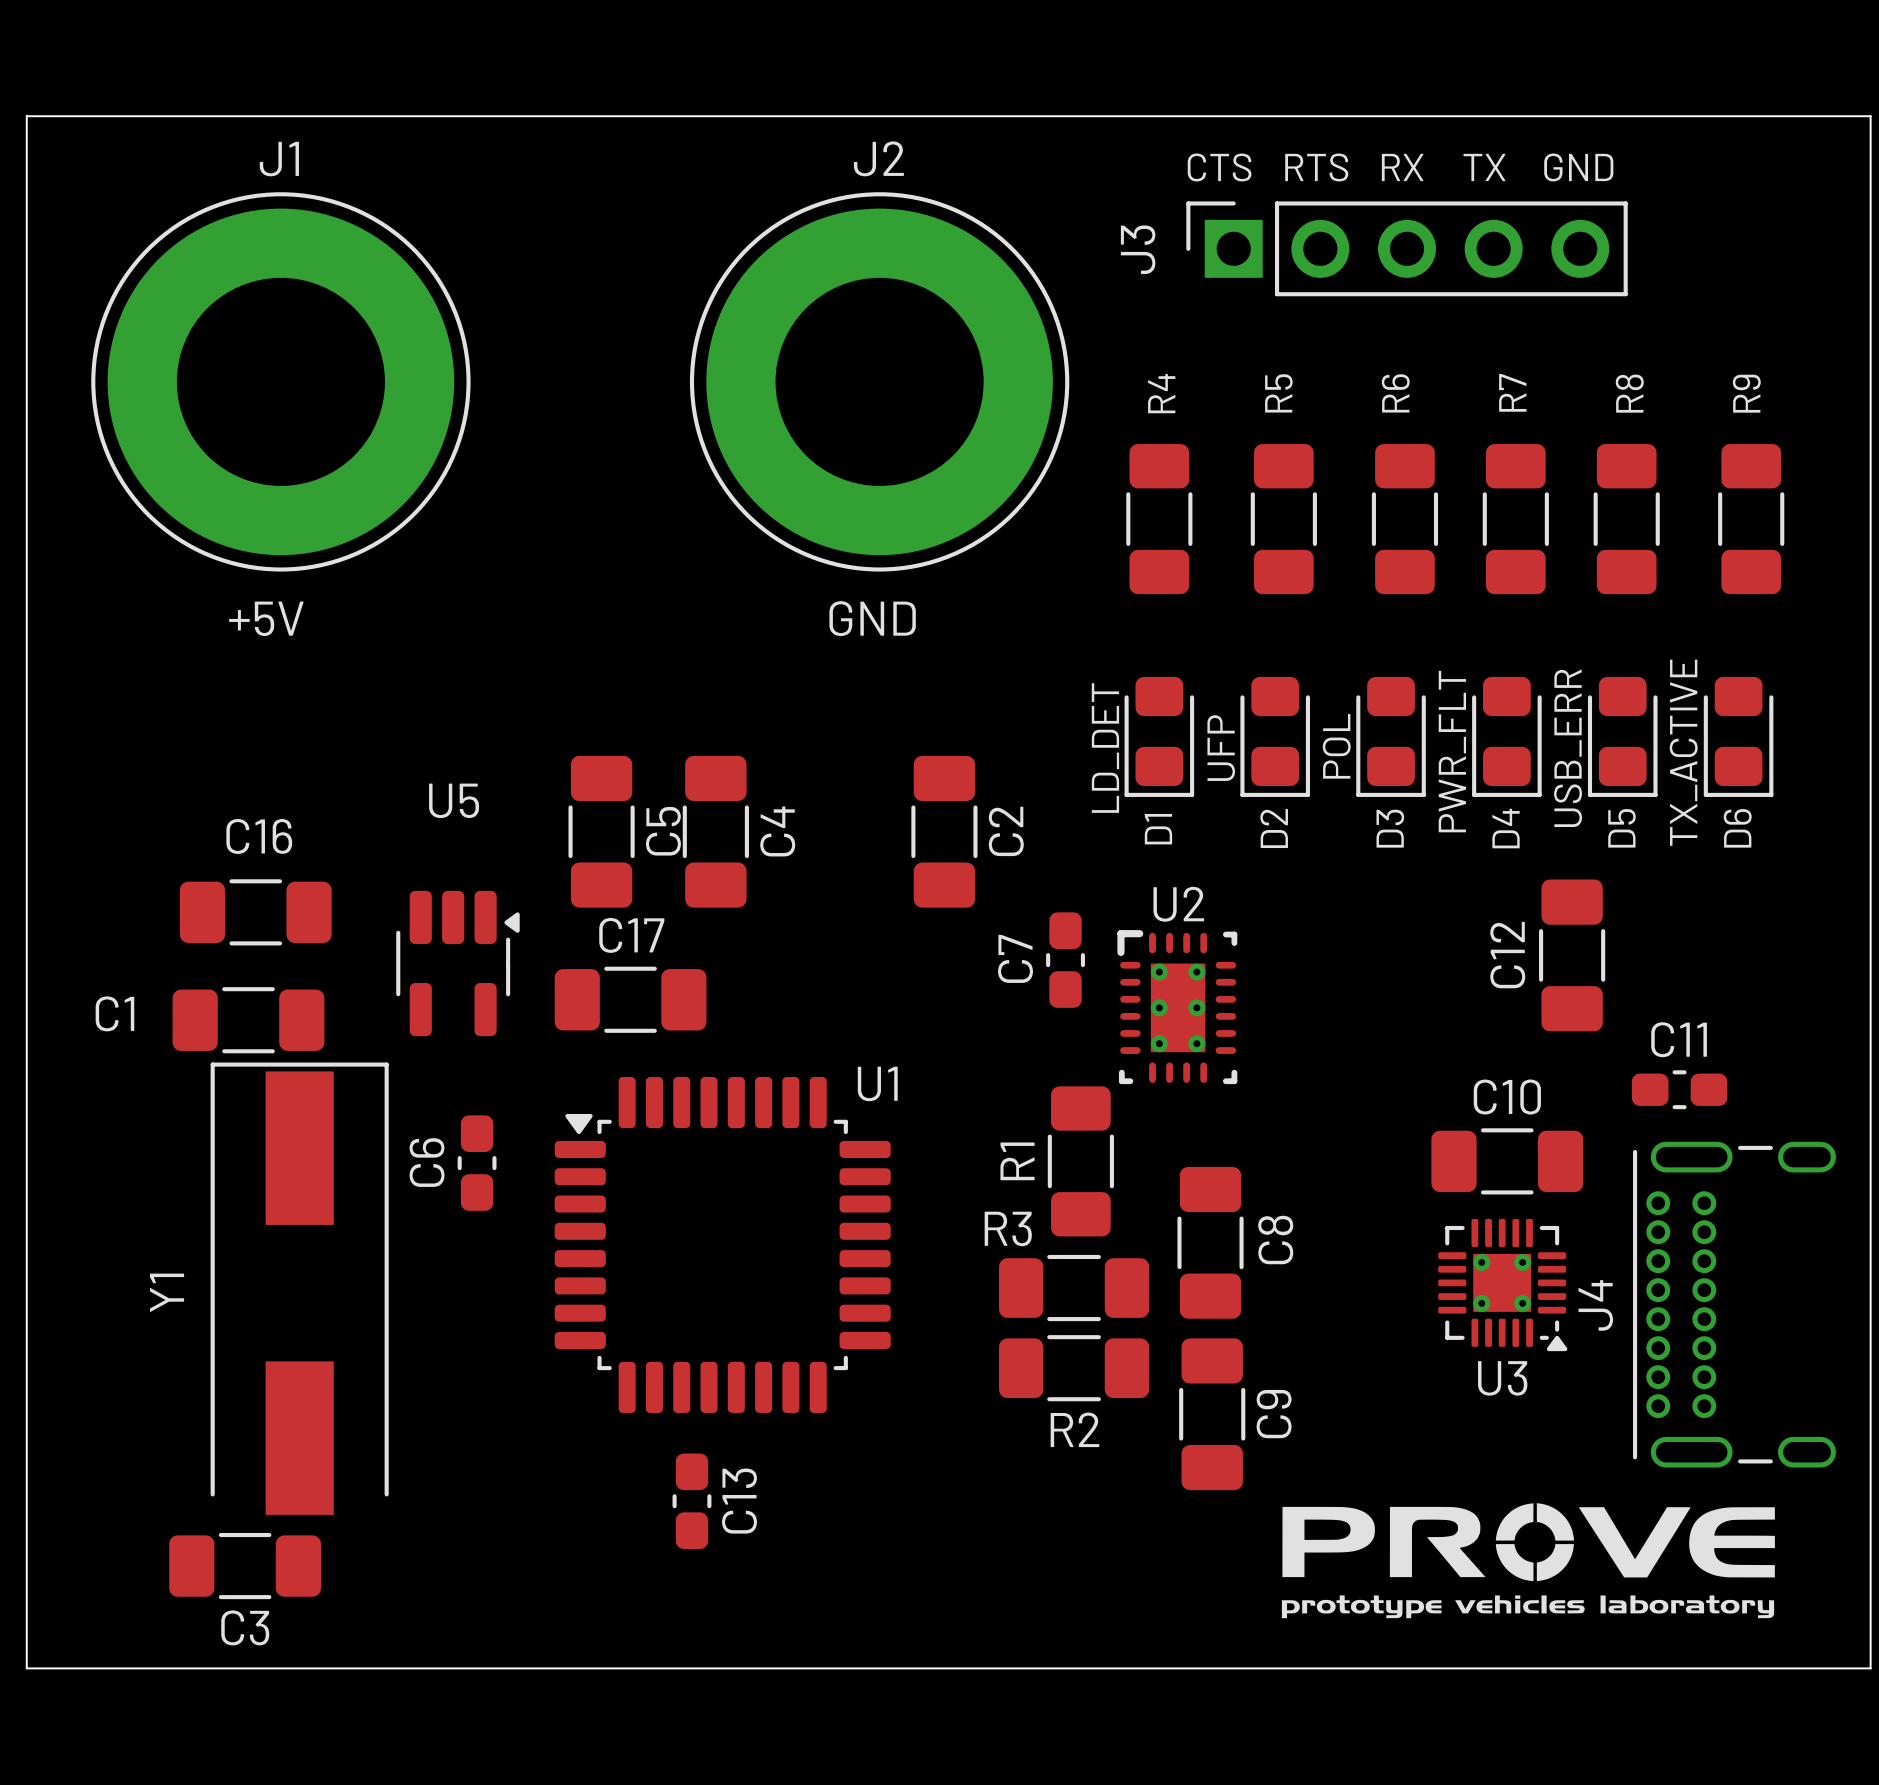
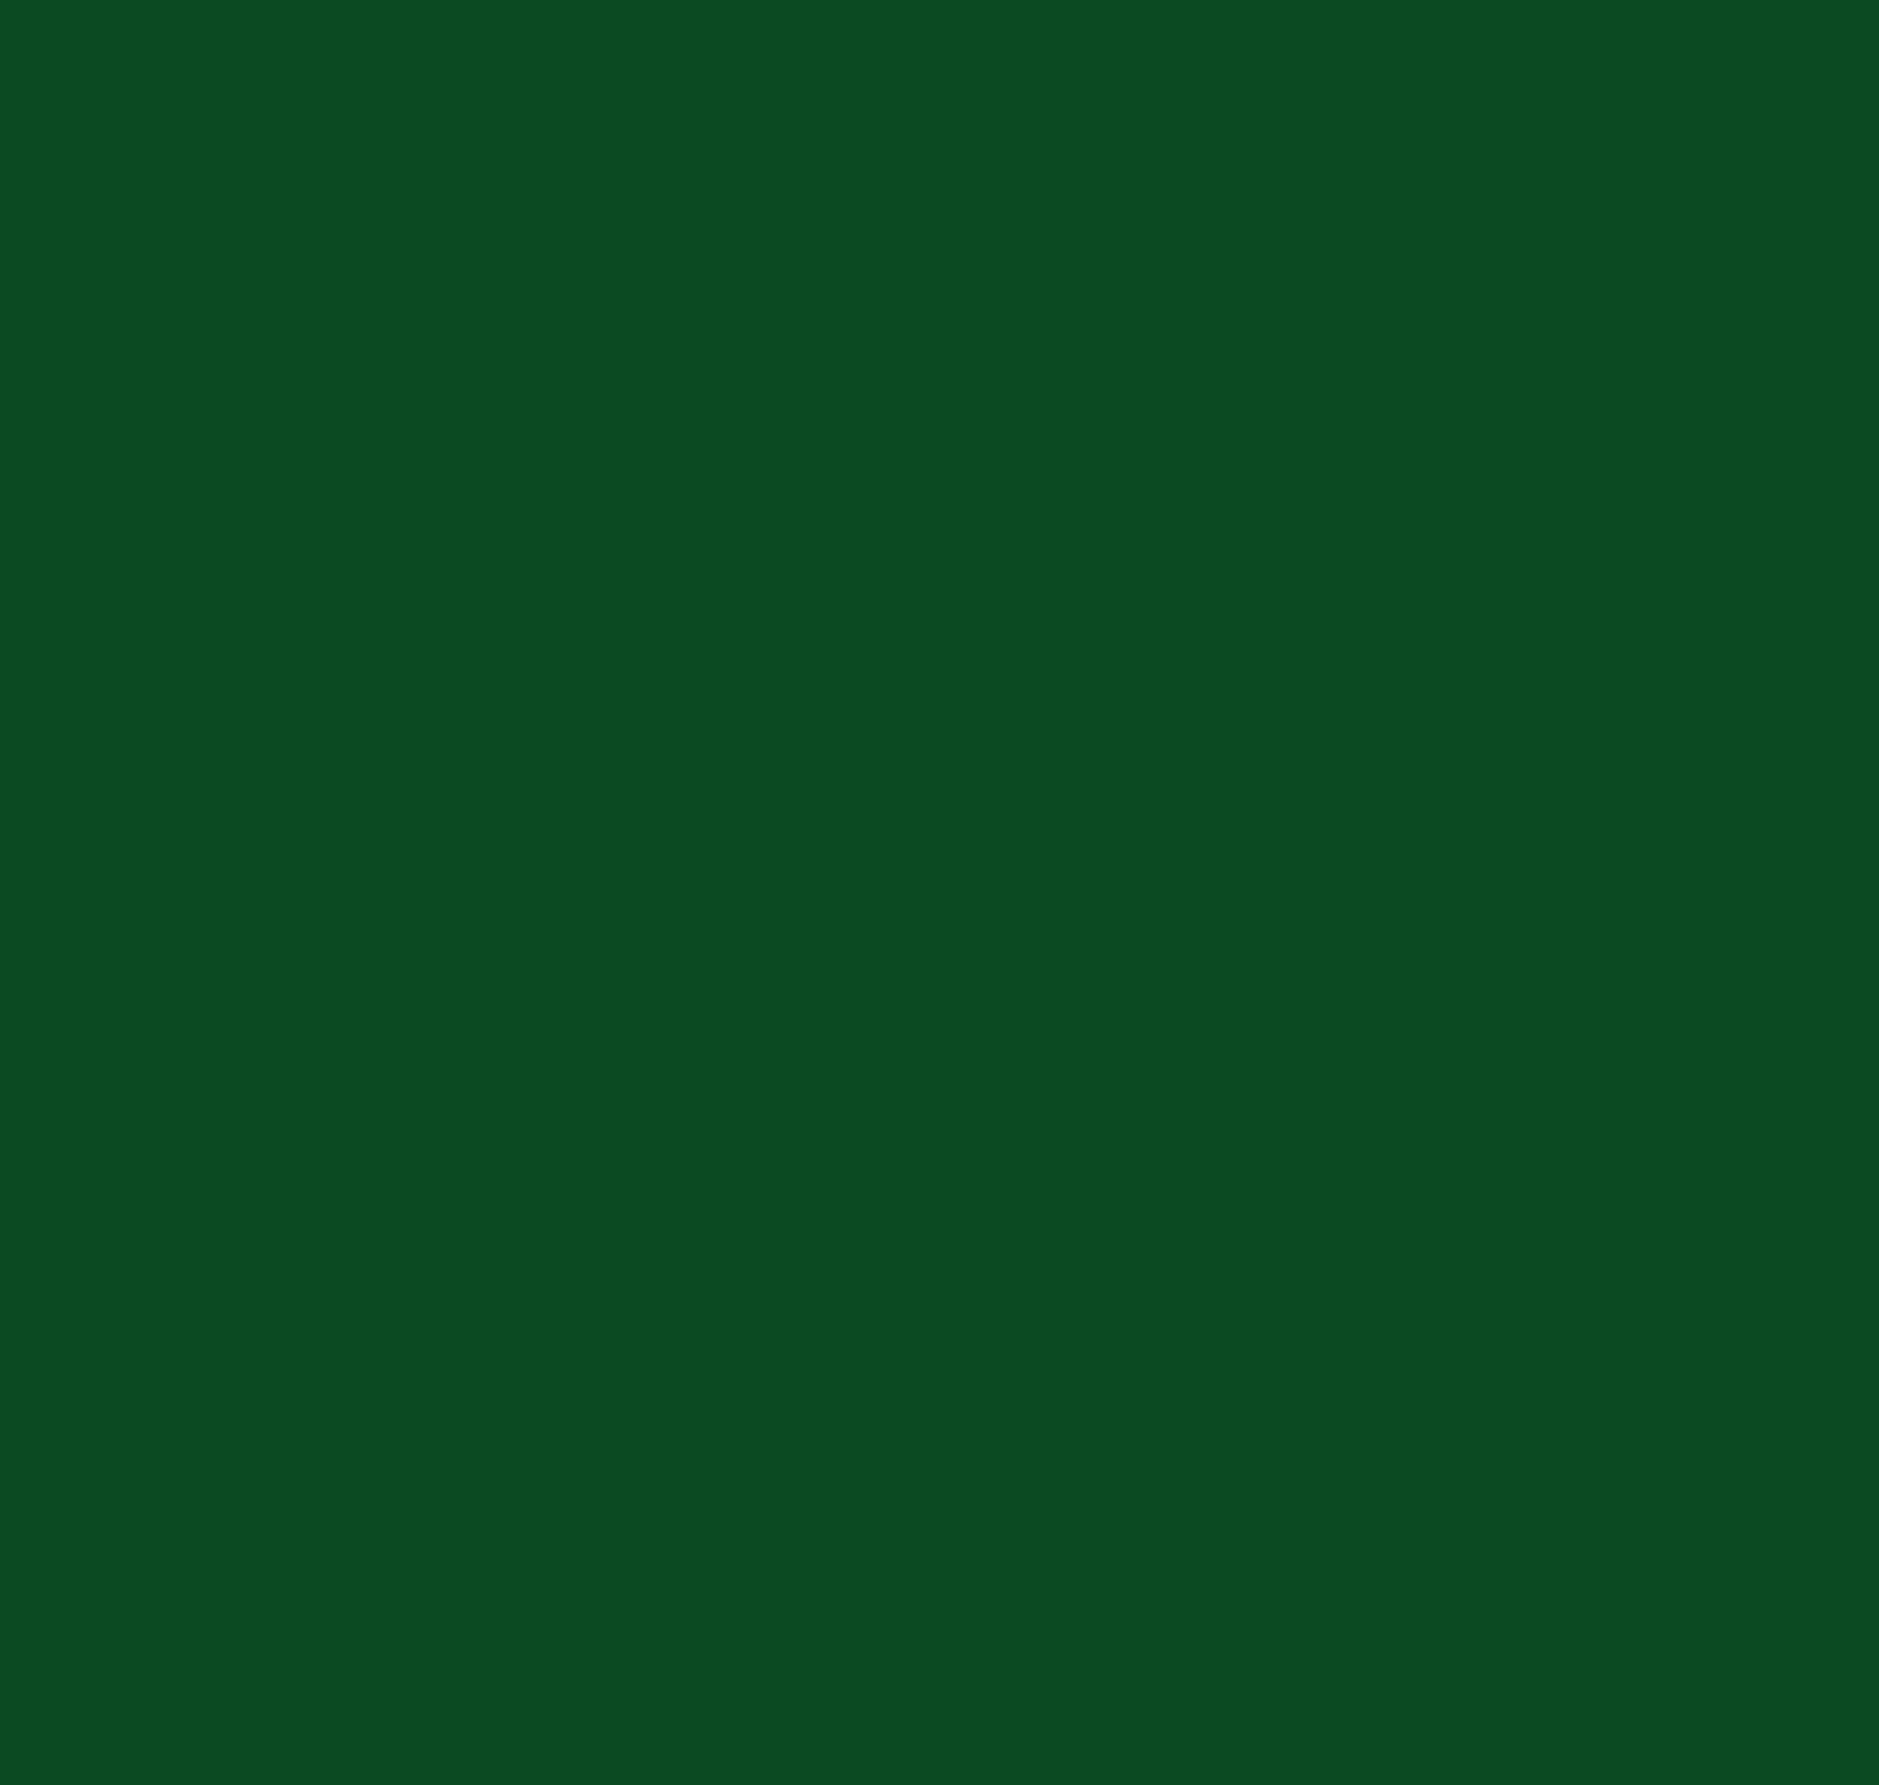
board edge: (26, 116) (1870, 116) (1870, 1668) (26, 1668) (26, 116) -> none
text: CTS (1219, 167) -> none
text: RTS (1316, 167) -> none
text: RX (1402, 167) -> none
text: TX (1484, 167) -> none
text: GND (1578, 167) -> none
J3: (1407, 248) -> none
J1: (280, 381) -> none
J2: (879, 381) -> none
R4: (1159, 519) -> none
R5: (1283, 519) -> none
R6: (1404, 519) -> none
R7: (1515, 519) -> none
R8: (1626, 519) -> none
R9: (1751, 519) -> none
text: +5V (266, 618) -> none
text: GND (872, 618) -> none
D1: (1159, 736) -> none
D2: (1275, 736) -> none
D3: (1391, 736) -> none
D4: (1506, 736) -> none
D5: (1622, 736) -> none
D6: (1738, 736) -> none
text: POL (1336, 746) -> none
text: LD_DET (1105, 748) -> none
text: UFP (1221, 748) -> none
text: USB_ERR (1568, 748) -> none
text: PWR_FLT (1452, 751) -> none
text: TX_ACTIVE (1683, 752) -> none
C5: (601, 831) -> none
C4: (715, 831) -> none
C2: (944, 831) -> none
C16: (255, 912) -> none
C12: (1572, 955) -> none
C7: (1065, 960) -> none
U5: (457, 963) -> none
C17: (630, 999) -> none
U2: (1177, 1007) -> none
C1: (248, 1020) -> none
C11: (1679, 1089) -> none
R1: (1080, 1161) -> none
C10: (1507, 1161) -> none
C6: (477, 1163) -> none
C8: (1210, 1242) -> none
U1: (722, 1244) -> none
U3: (1502, 1285) -> none
Y1: (299, 1288) -> none
R3: (1074, 1288) -> none
J4: (1734, 1304) -> none
R2: (1074, 1368) -> none
C9: (1212, 1414) -> none
C13: (691, 1501) -> none
drawing: [1281, 1503, 1775, 1619] -> none
C3: (245, 1566) -> none

